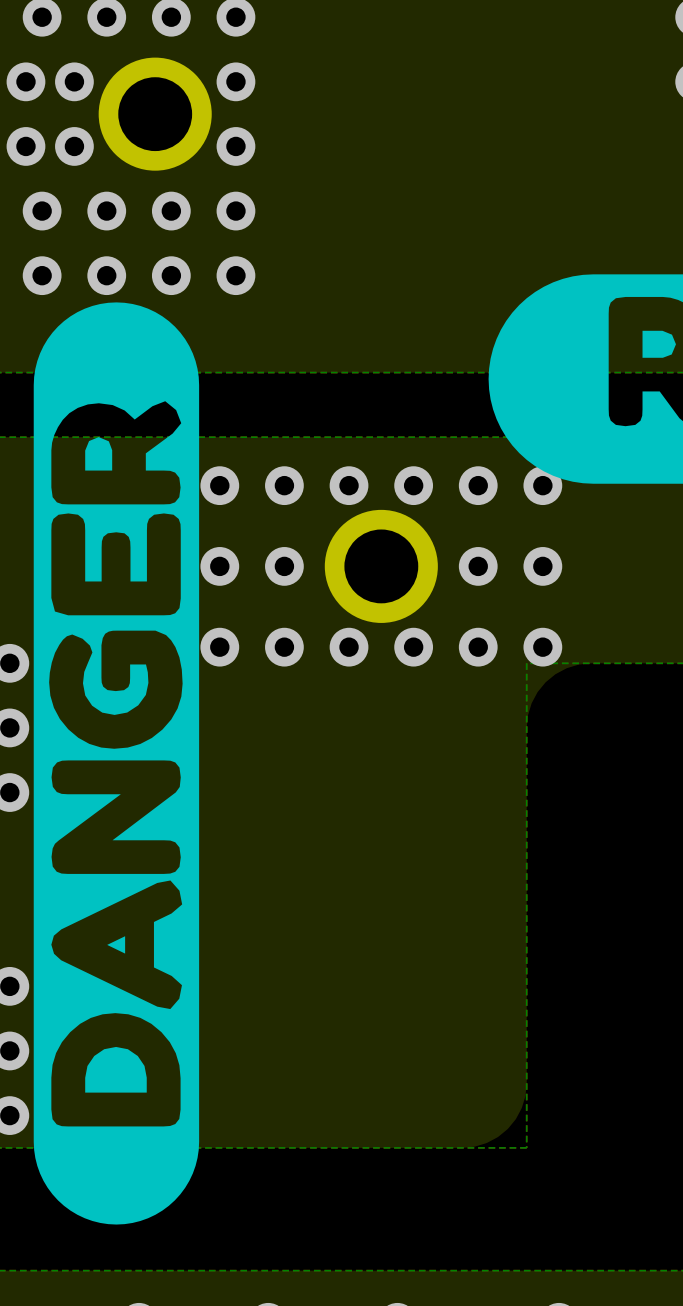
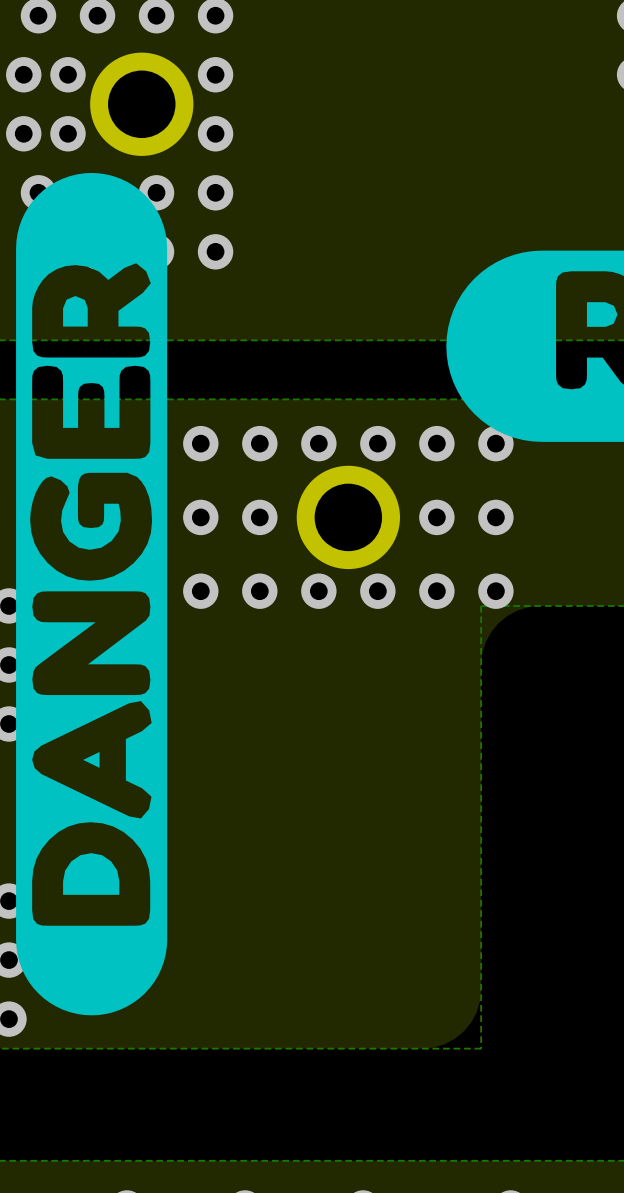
drawing position: (116, 763) -> (91, 594)

